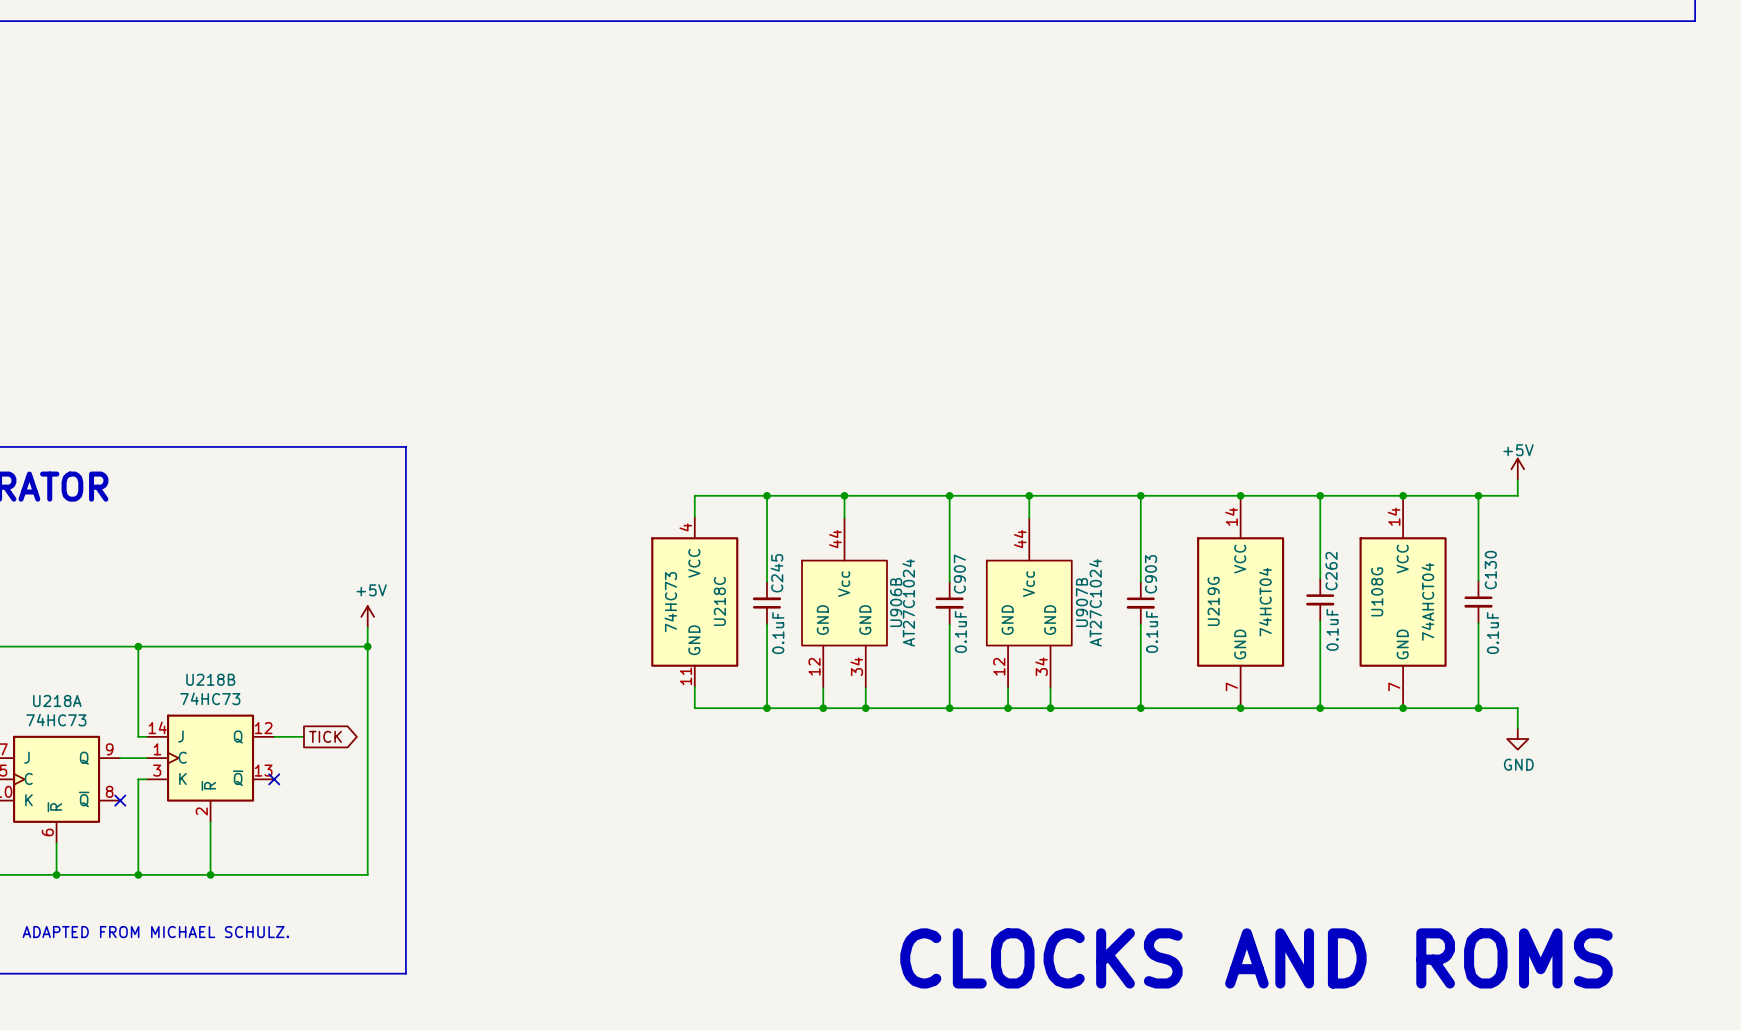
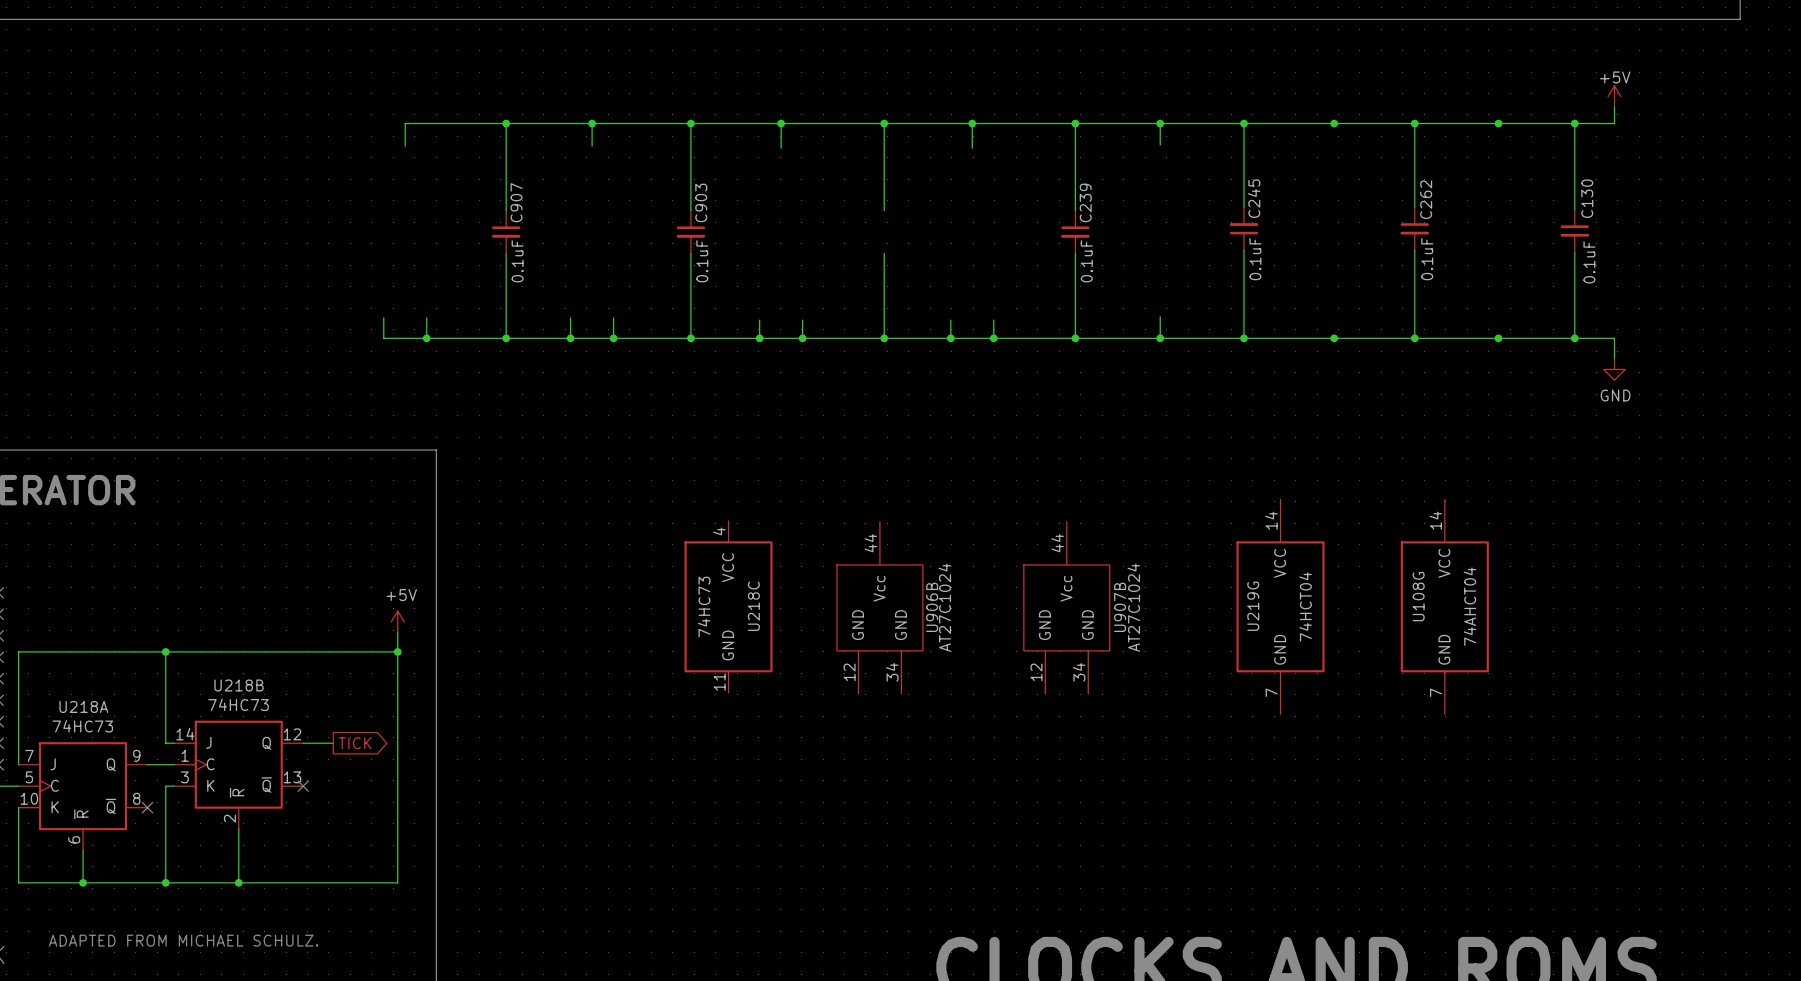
power symbol: none -> +5V (1614, 96)
wire: none -> (1614, 107) (1614, 123) (405, 123) (405, 146)
wire: none -> (506, 123) (506, 210)
junction: none -> (506, 123)
wire: none -> (592, 123) (592, 146)
junction: none -> (592, 123)
wire: none -> (690, 123) (690, 210)
junction: none -> (690, 123)
wire: none -> (781, 123) (781, 148)
junction: none -> (781, 123)
wire: none -> (884, 123) (884, 210)
junction: none -> (884, 123)
wire: none -> (972, 123) (972, 148)
junction: none -> (972, 123)
wire: none -> (1075, 123) (1075, 210)
junction: none -> (1075, 123)
wire: none -> (1160, 123) (1160, 145)
junction: none -> (1160, 123)
wire: none -> (1244, 123) (1244, 207)
junction: none -> (1244, 123)
junction: none -> (1334, 123)
wire: none -> (1414, 123) (1414, 207)
junction: none -> (1414, 123)
junction: none -> (1498, 123)
wire: none -> (1574, 123) (1574, 209)
junction: none -> (1574, 123)
C239: none -> 0.1uF (1075, 232)
wire: none -> (1244, 250) (1244, 338)
wire: none -> (1414, 250) (1414, 338)
wire: none -> (1574, 252) (1574, 338)
wire: none -> (506, 253) (506, 338)
wire: none -> (690, 253) (690, 338)
wire: none -> (884, 253) (884, 338)
wire: none -> (1075, 253) (1075, 338)
wire: none -> (1160, 316) (1160, 338)
wire: none -> (383, 317) (383, 338) (1614, 338) (1614, 358)
wire: none -> (426, 317) (426, 338)
wire: none -> (570, 317) (570, 338)
wire: none -> (613, 317) (613, 338)
wire: none -> (759, 320) (759, 338)
wire: none -> (802, 320) (802, 338)
wire: none -> (950, 320) (950, 338)
wire: none -> (993, 320) (993, 338)
junction: none -> (426, 338)
junction: none -> (506, 338)
junction: none -> (570, 338)
junction: none -> (613, 338)
junction: none -> (690, 338)
junction: none -> (759, 338)
junction: none -> (802, 338)
junction: none -> (884, 338)
junction: none -> (950, 338)
junction: none -> (993, 338)
junction: none -> (1075, 338)
junction: none -> (1160, 338)
junction: none -> (1244, 338)
junction: none -> (1334, 338)
junction: none -> (1414, 338)
junction: none -> (1498, 338)
junction: none -> (1574, 338)
power symbol: none -> GND (1614, 369)
power symbol: +5V (1517, 469) -> none
wire: (1517, 479) (1517, 495) (694, 495) (694, 517) -> none
wire: (766, 495) (766, 581) -> none
junction: (766, 495) -> none
wire: (844, 495) (844, 518) -> none
junction: (844, 495) -> none
wire: (949, 495) (949, 581) -> none
junction: (949, 495) -> none
wire: (1029, 495) (1029, 518) -> none
junction: (1029, 495) -> none
wire: (1140, 495) (1140, 581) -> none
junction: (1140, 495) -> none
junction: (1240, 495) -> none
wire: (1320, 495) (1320, 578) -> none
junction: (1320, 495) -> none
junction: (1403, 495) -> none
wire: (1478, 495) (1478, 580) -> none
junction: (1478, 495) -> none
C262 position: (1320, 599) -> (1414, 228)
C130 position: (1478, 602) -> (1574, 230)
C245 position: (766, 603) -> (1244, 228)
C907 position: (949, 603) -> (506, 232)
C903 position: (1140, 603) -> (690, 232)
wire: (1320, 621) (1320, 708) -> none
wire: (1478, 623) (1478, 708) -> none
wire: (766, 624) (766, 708) -> none
wire: (949, 624) (949, 708) -> none
wire: (1140, 624) (1140, 708) -> none
wire: (694, 686) (694, 708) (1517, 708) (1517, 728) -> none
wire: (823, 688) (823, 708) -> none
wire: (865, 688) (865, 708) -> none
wire: (1008, 688) (1008, 708) -> none
wire: (1050, 688) (1050, 708) -> none
junction: (766, 708) -> none
junction: (823, 708) -> none
junction: (865, 708) -> none
junction: (949, 708) -> none
junction: (1008, 708) -> none
junction: (1050, 708) -> none
junction: (1140, 708) -> none
junction: (1240, 708) -> none
junction: (1320, 708) -> none
junction: (1403, 708) -> none
junction: (1478, 708) -> none
power symbol: GND (1517, 738) -> none

